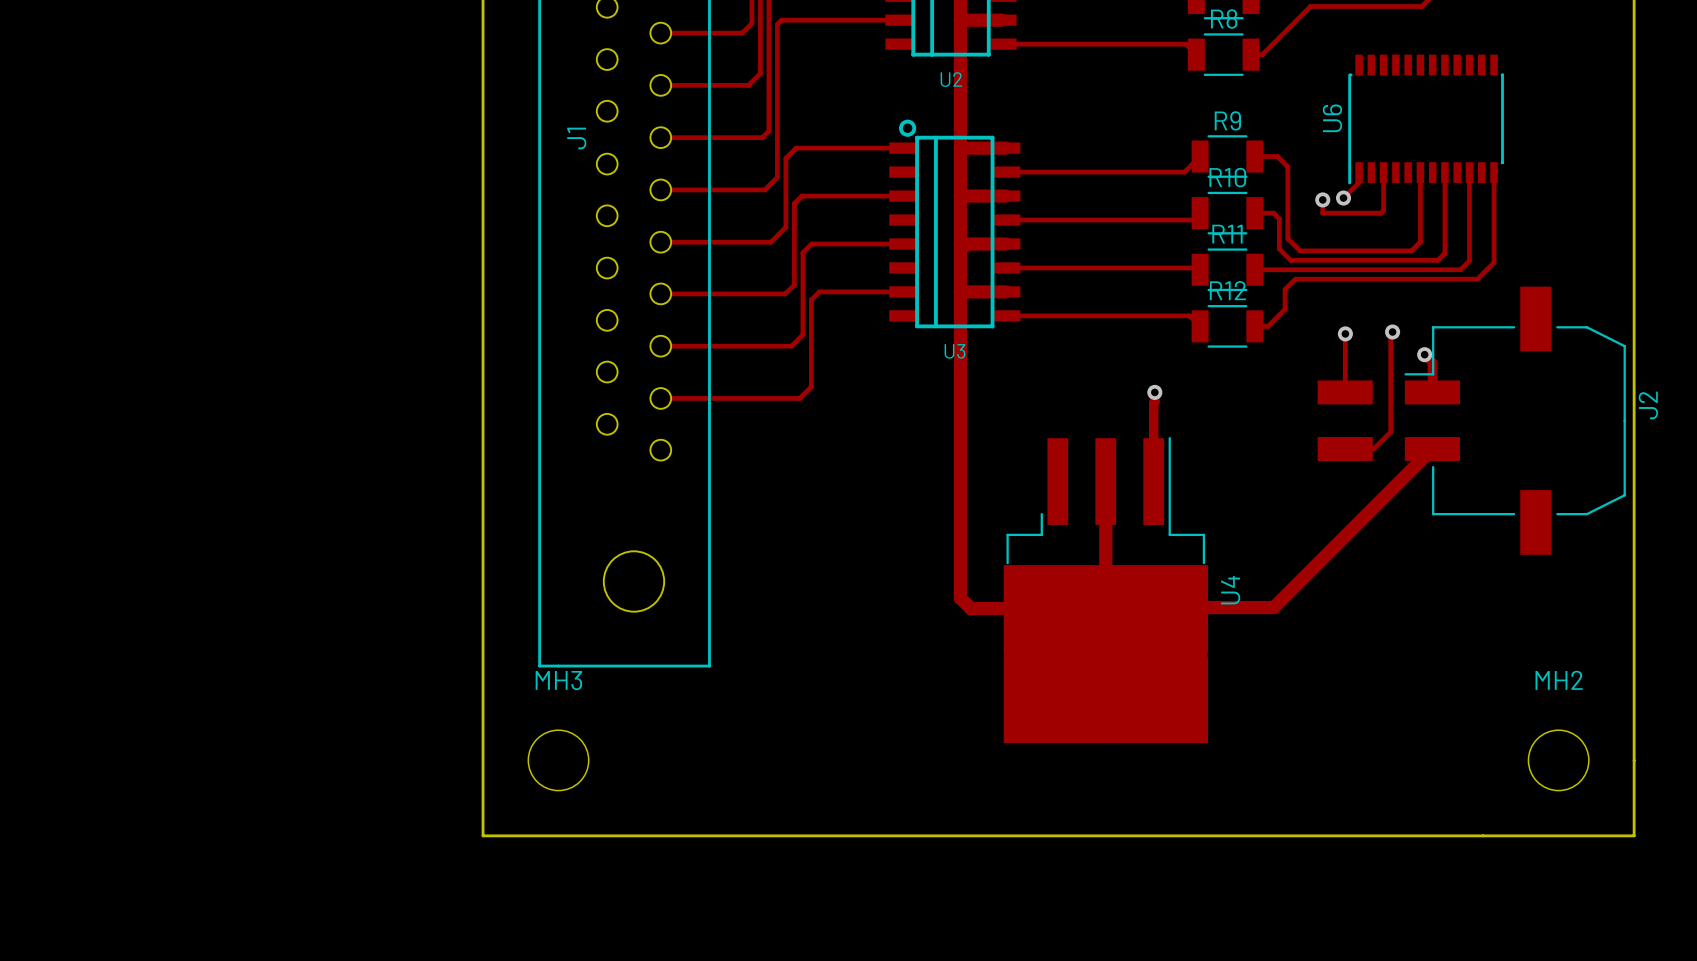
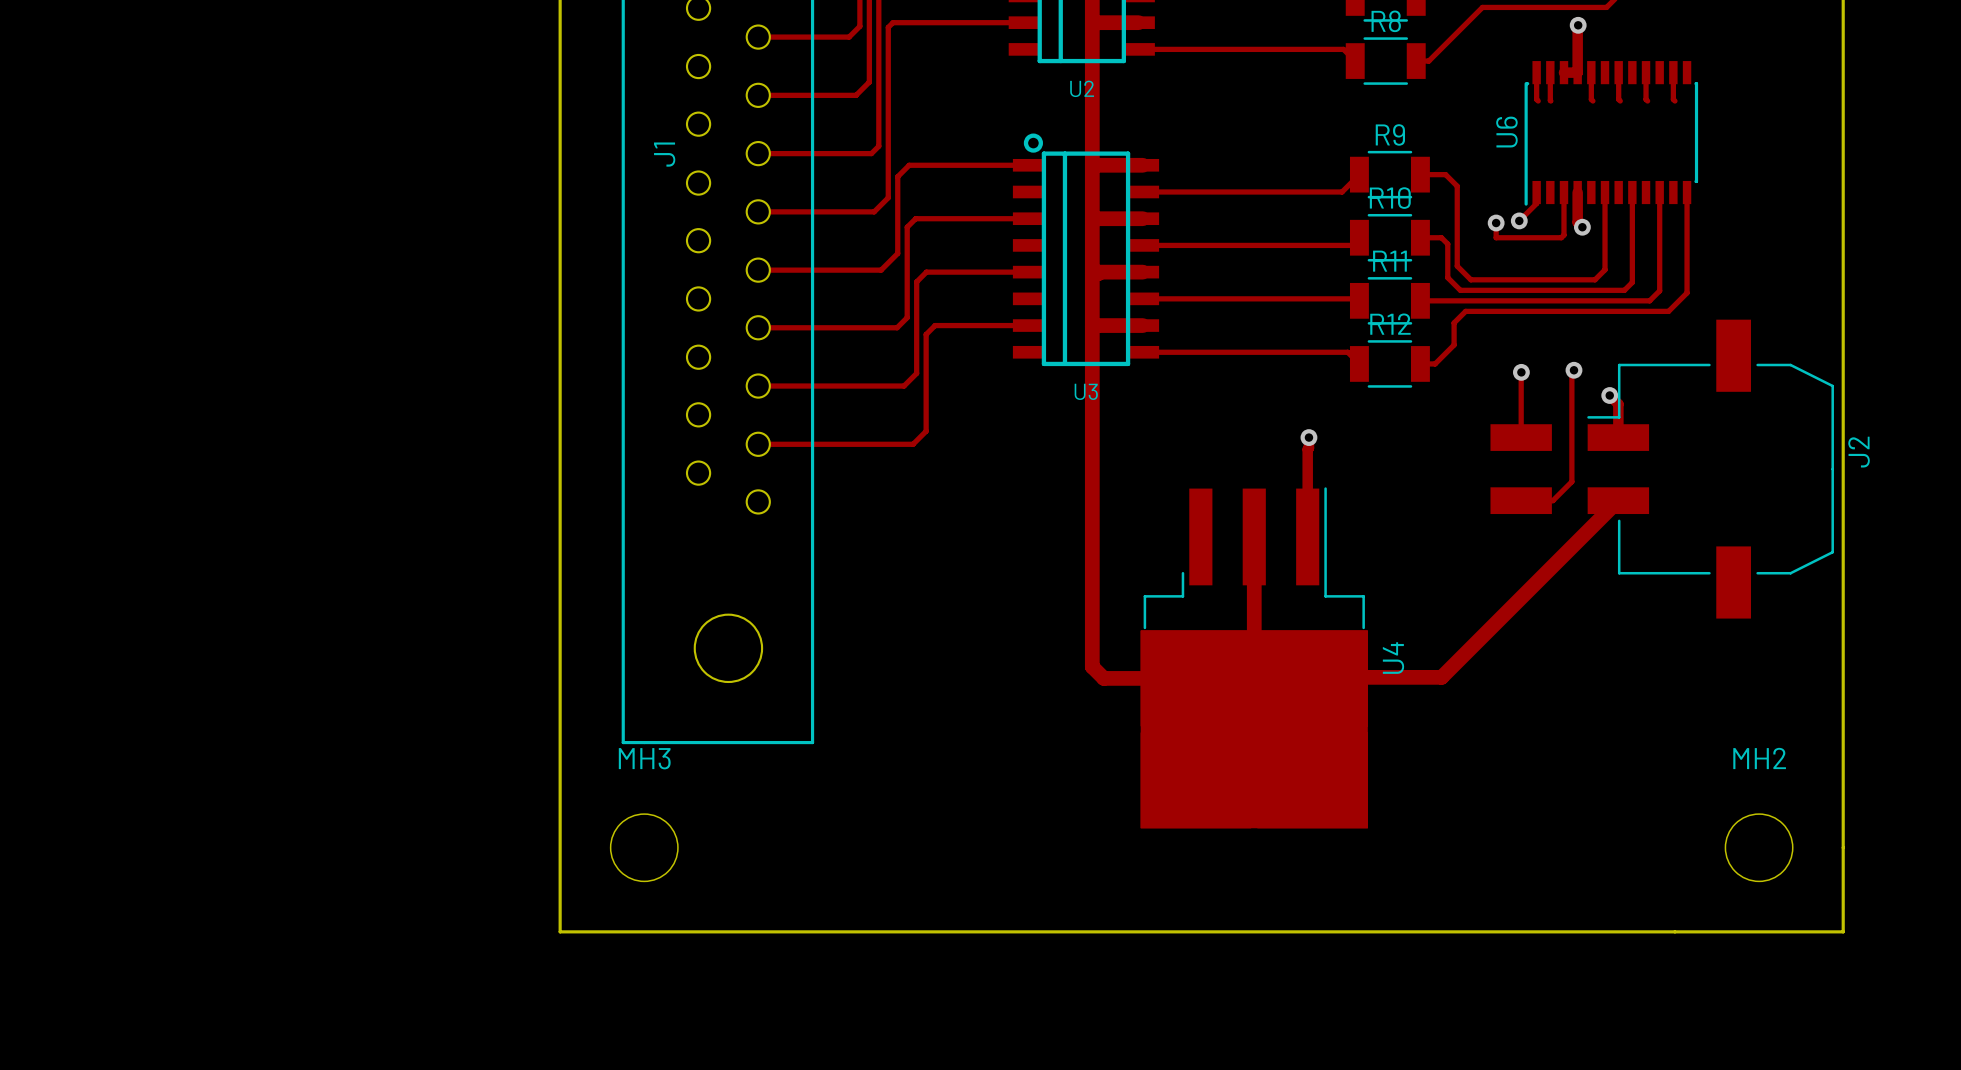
track: none -> (1578, 25) (1577, 72) (1563, 72)
via: none -> (1578, 25)
track: none -> (1536, 72) (1538, 101)
track: none -> (1550, 72) (1550, 101)
track: none -> (1591, 72) (1592, 101)
track: none -> (1618, 72) (1620, 101)
track: none -> (1646, 72) (1647, 101)
track: none -> (1673, 72) (1674, 101)
track: none -> (1577, 192) (1577, 222) (1582, 227)
via: none -> (1582, 227)

